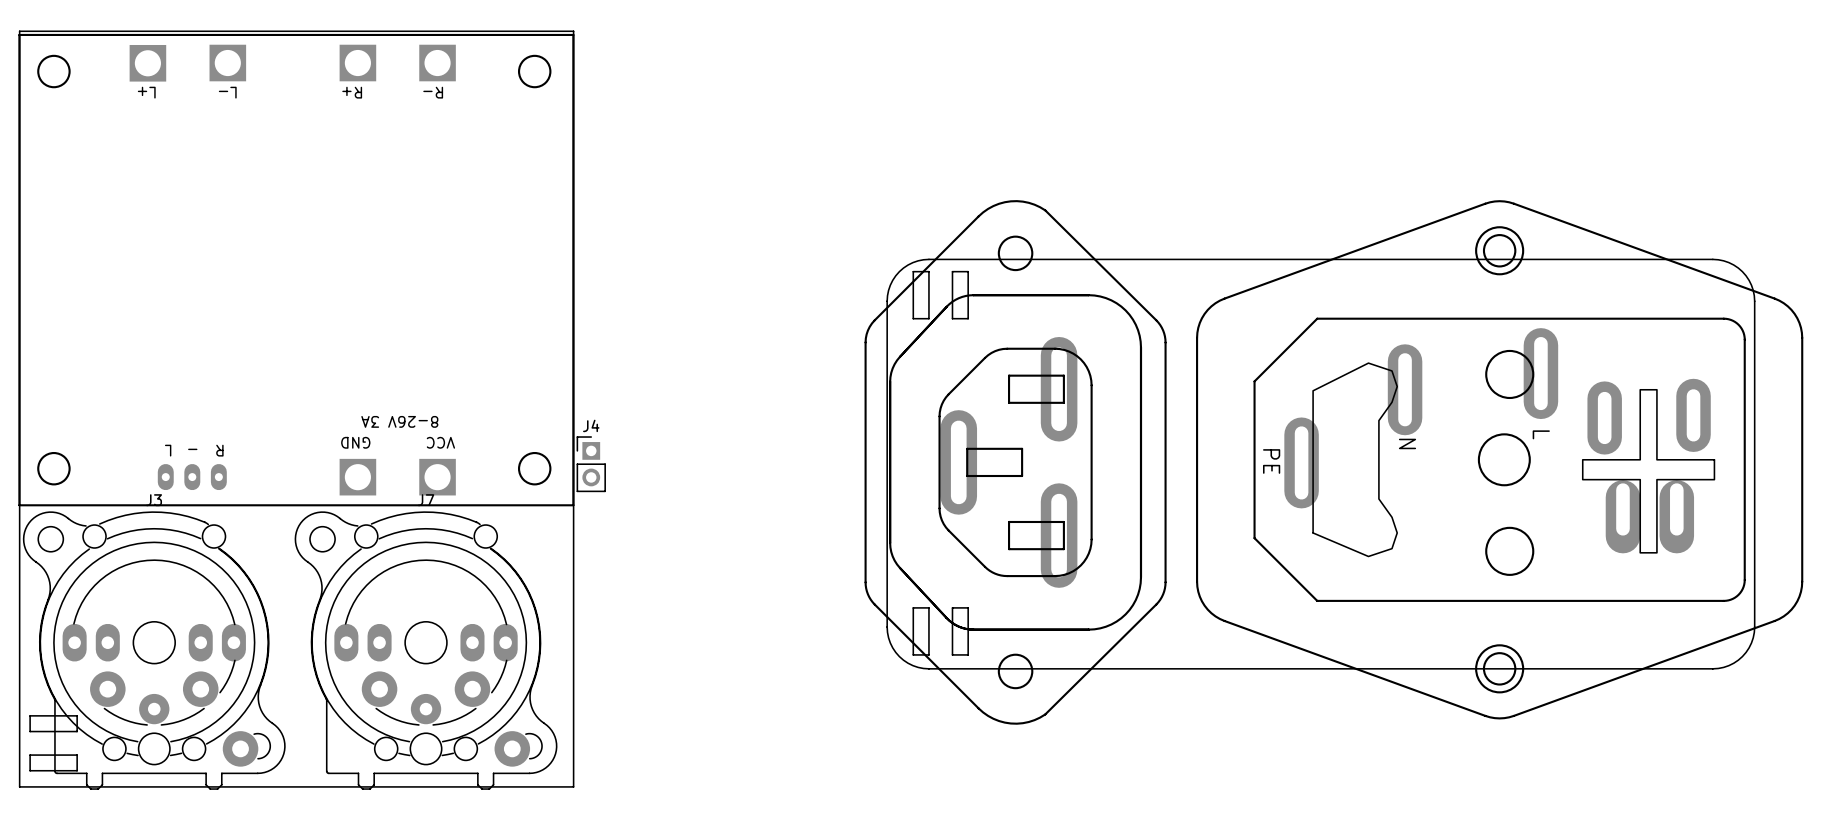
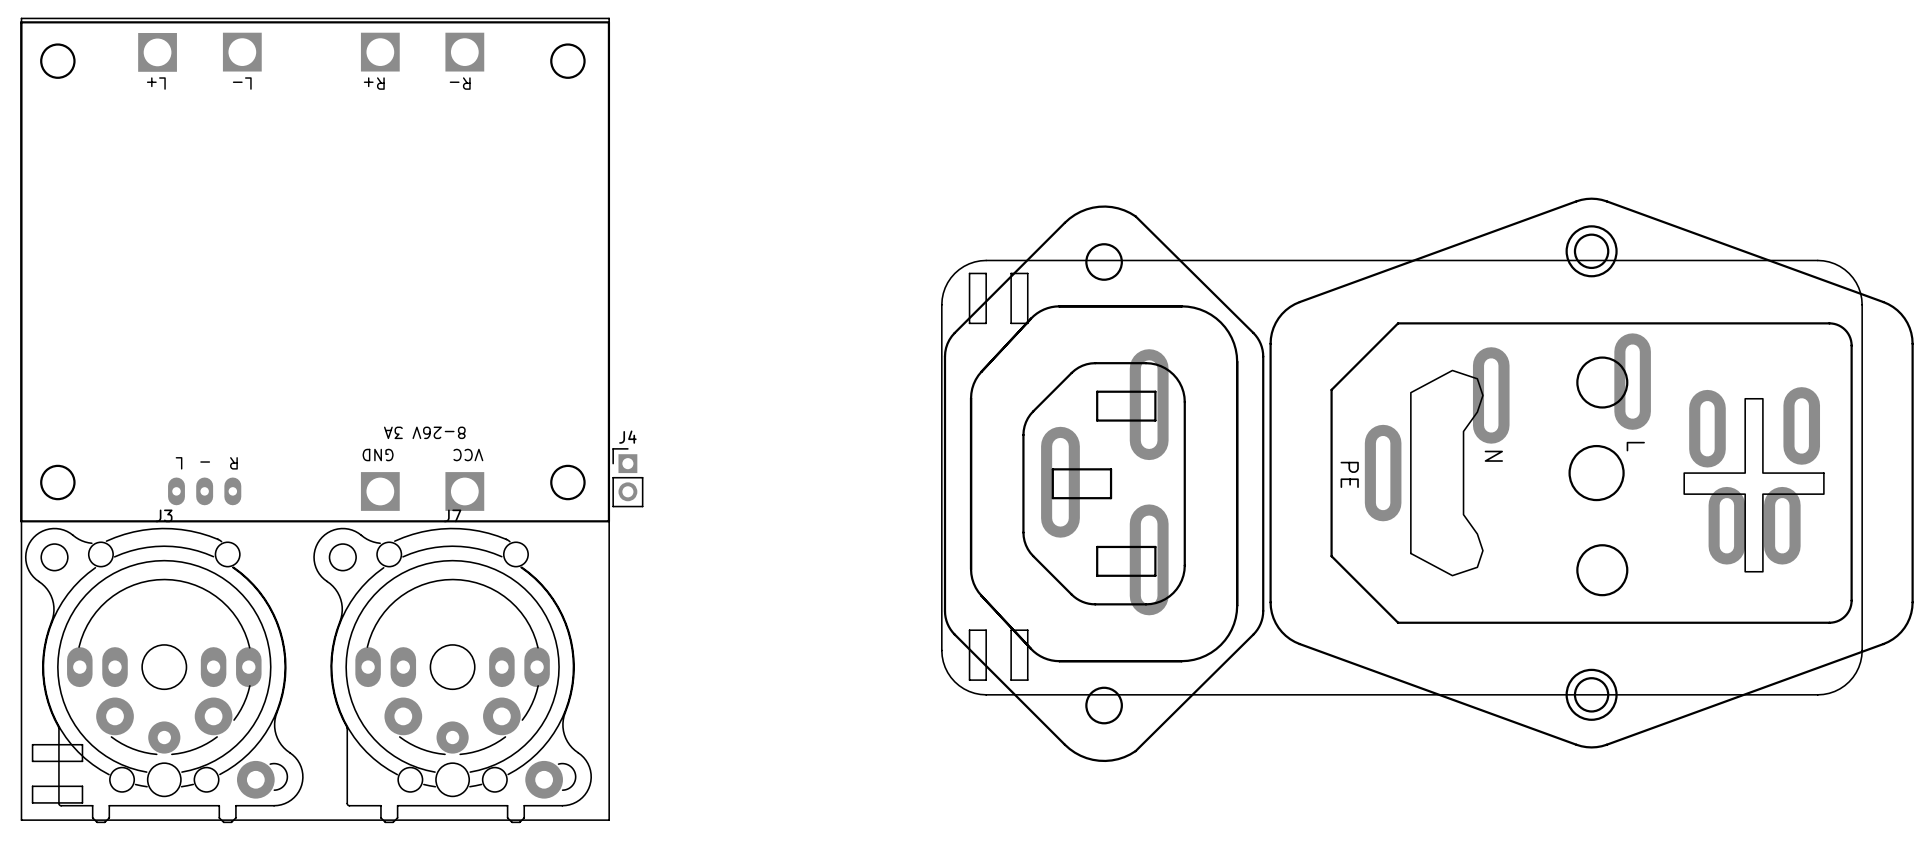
part footprint: [1196, 200, 1804, 720] -> [1269, 197, 1914, 749]
part: (1015, 462) -> none
part: none -> (1104, 483)

